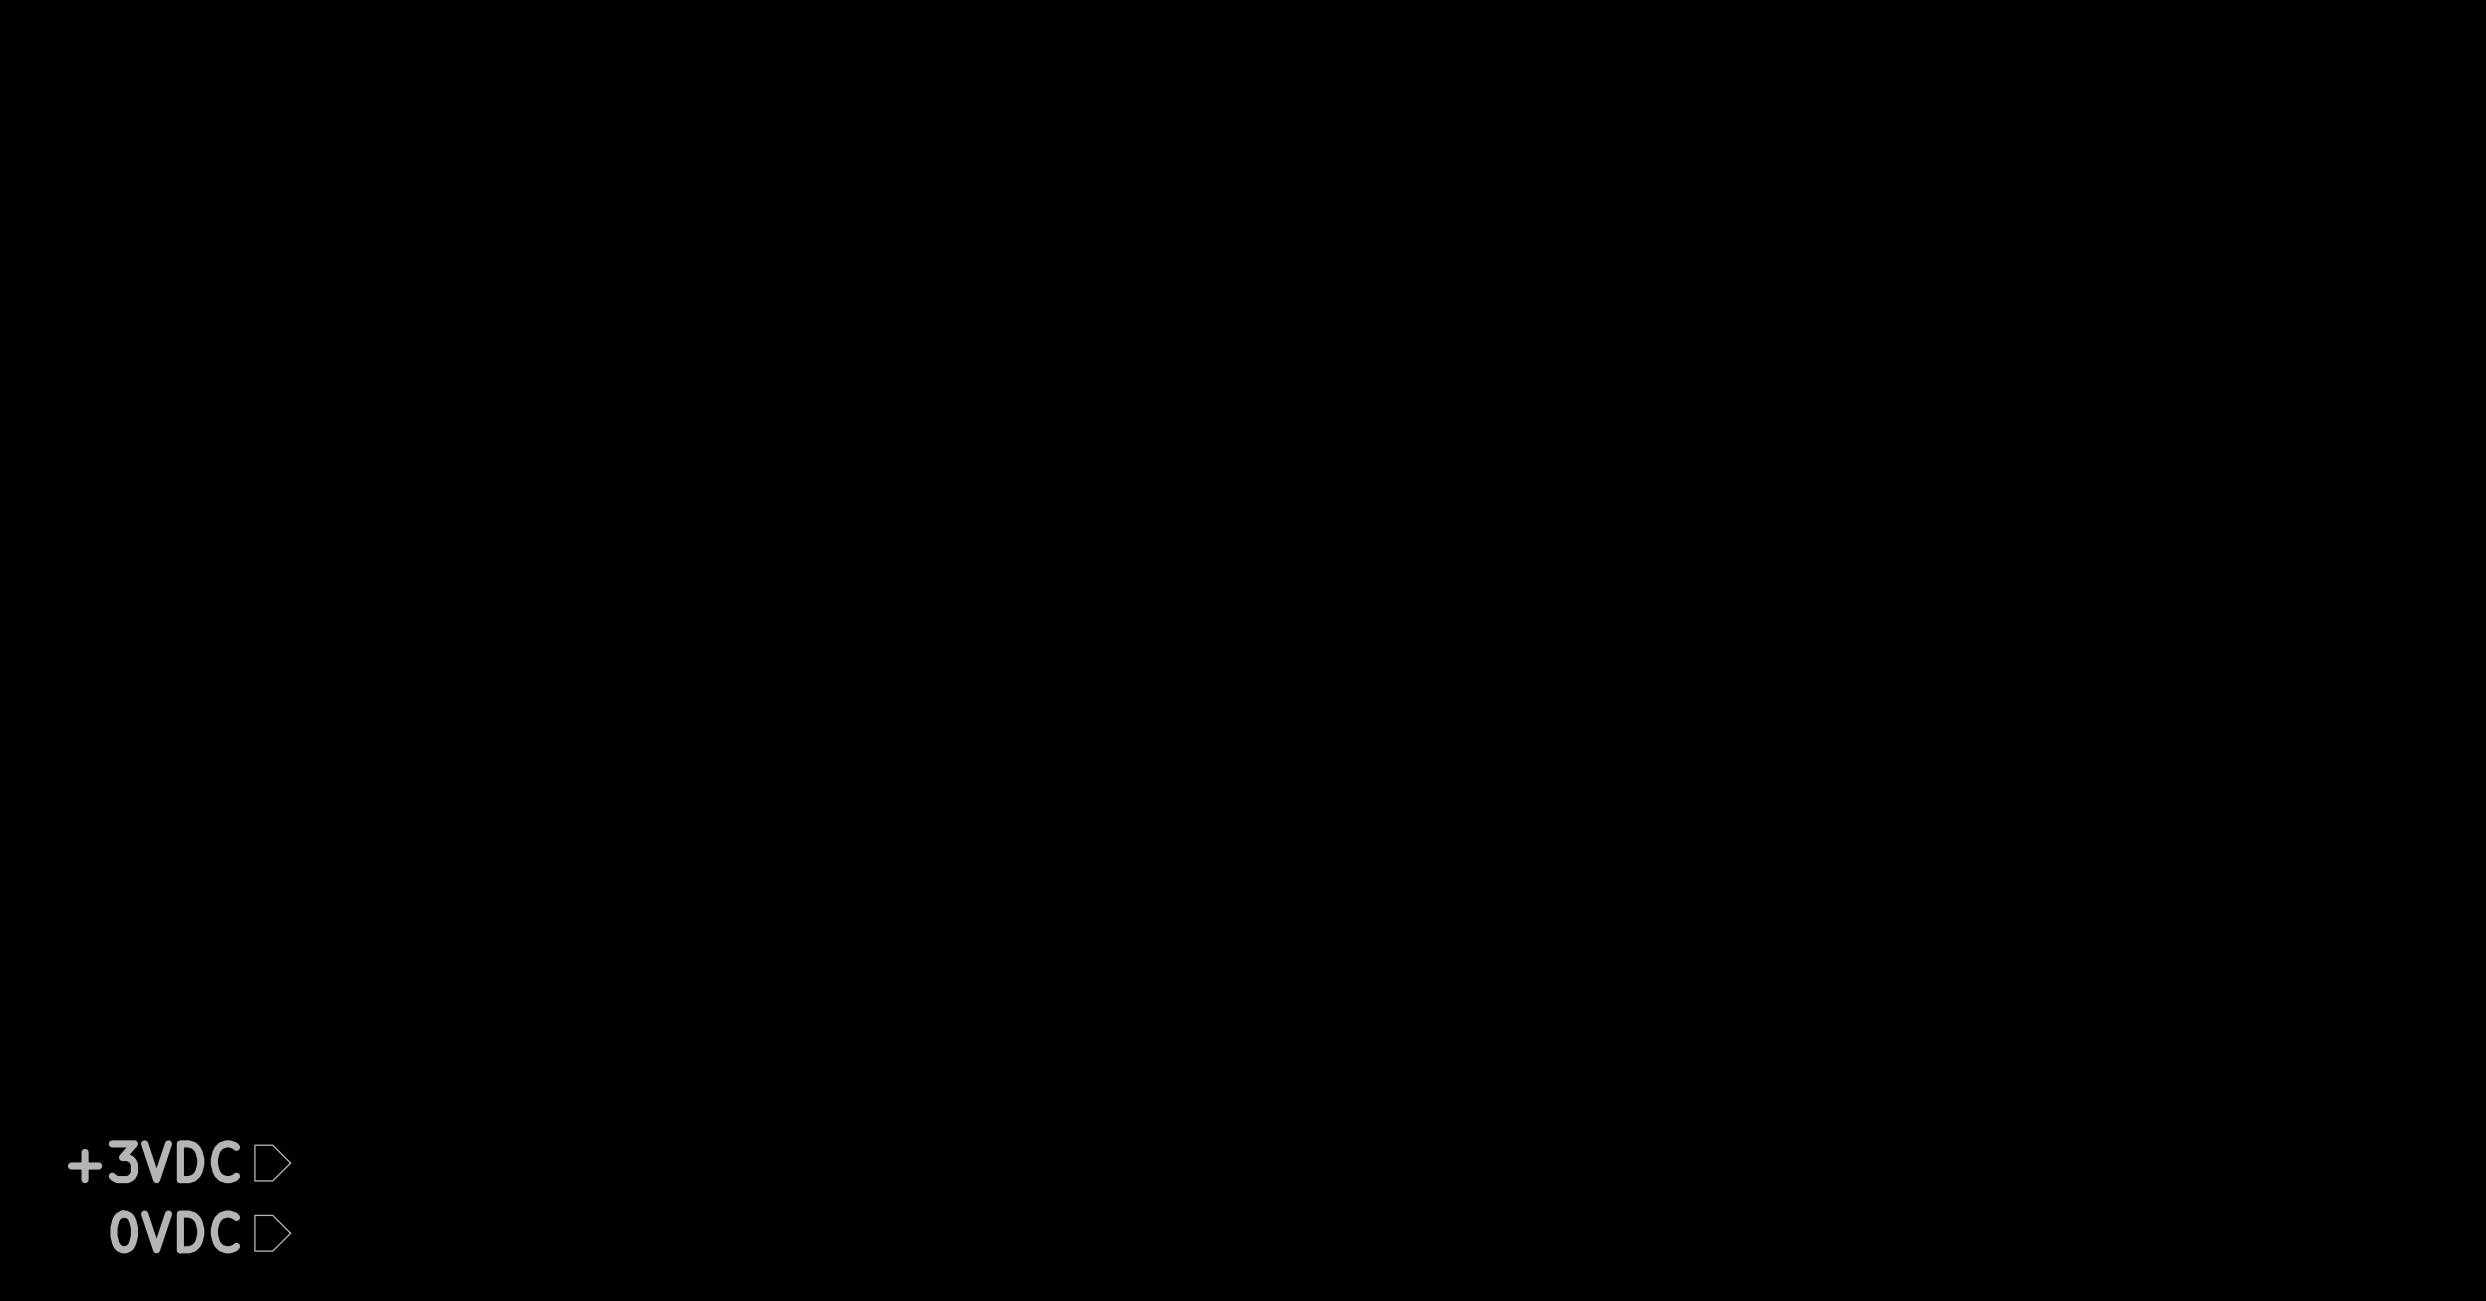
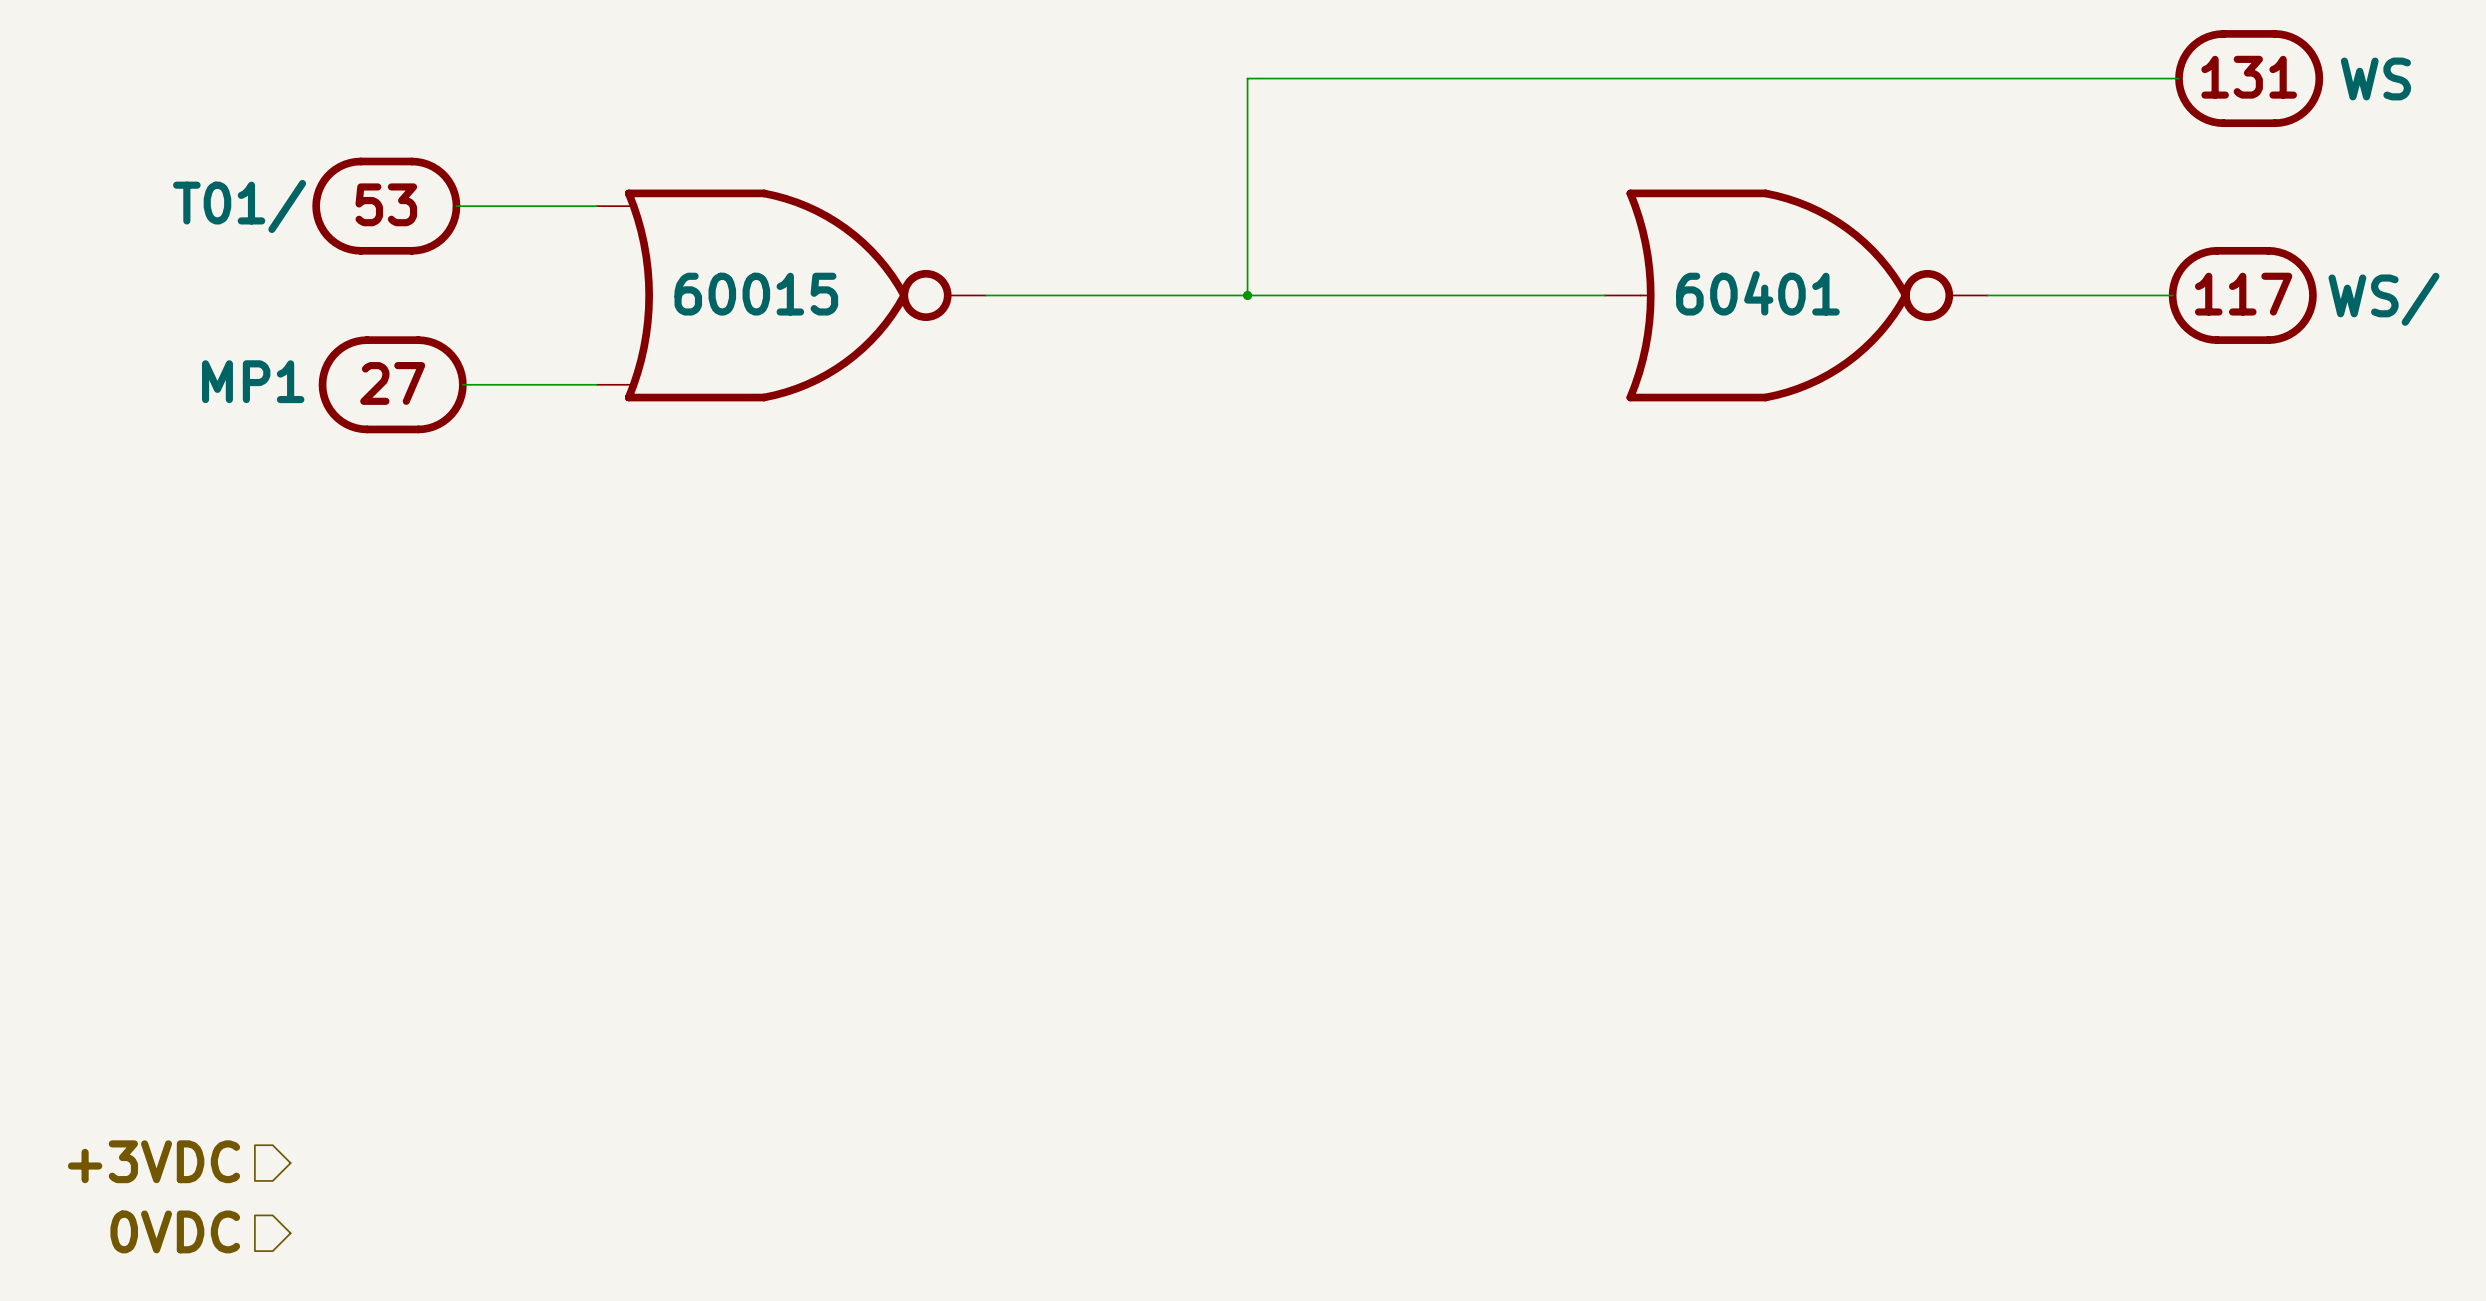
wire: none -> (2178, 78) (1247, 78) (1247, 295)
part: none -> (2249, 78)
part: none -> (386, 206)
wire: none -> (456, 206) (596, 206)
part: none -> (791, 295)
wire: none -> (985, 295) (1604, 295)
junction: none -> (1247, 295)
part: none -> (1796, 295)
wire: none -> (1987, 295) (2172, 295)
part: none -> (2242, 295)
part: none -> (392, 384)
wire: none -> (462, 384) (596, 384)

